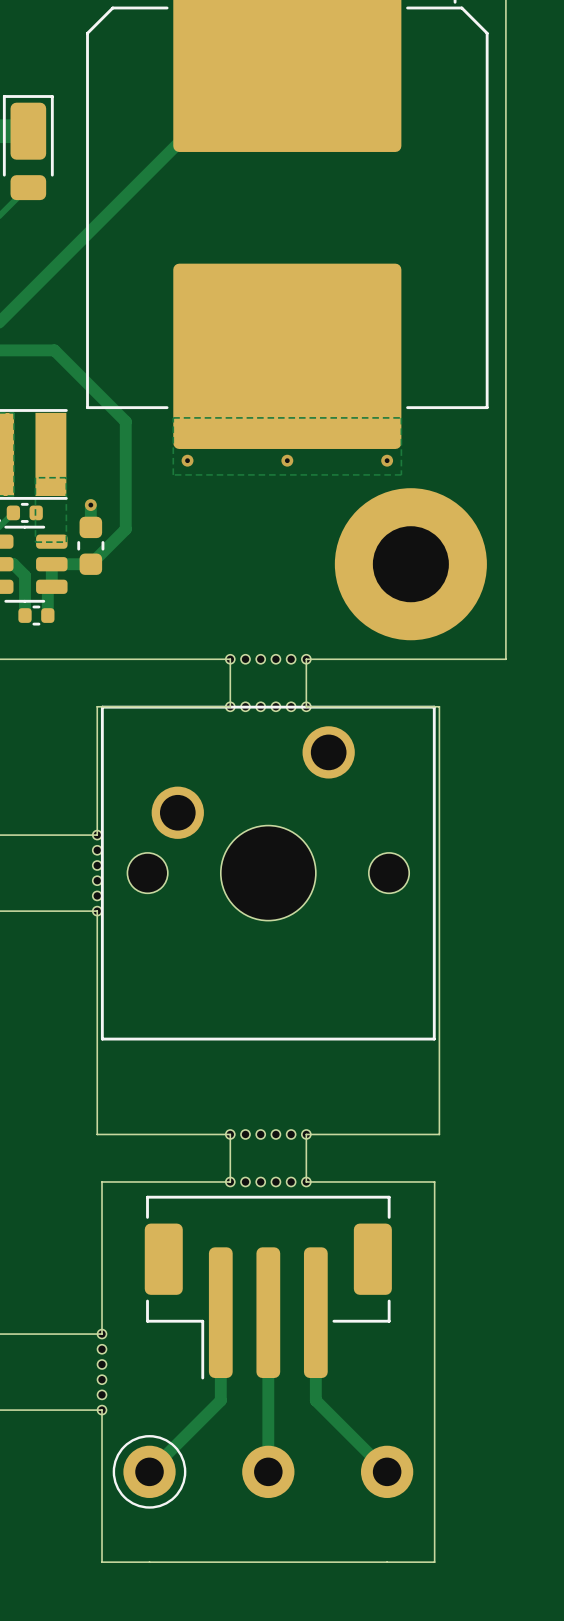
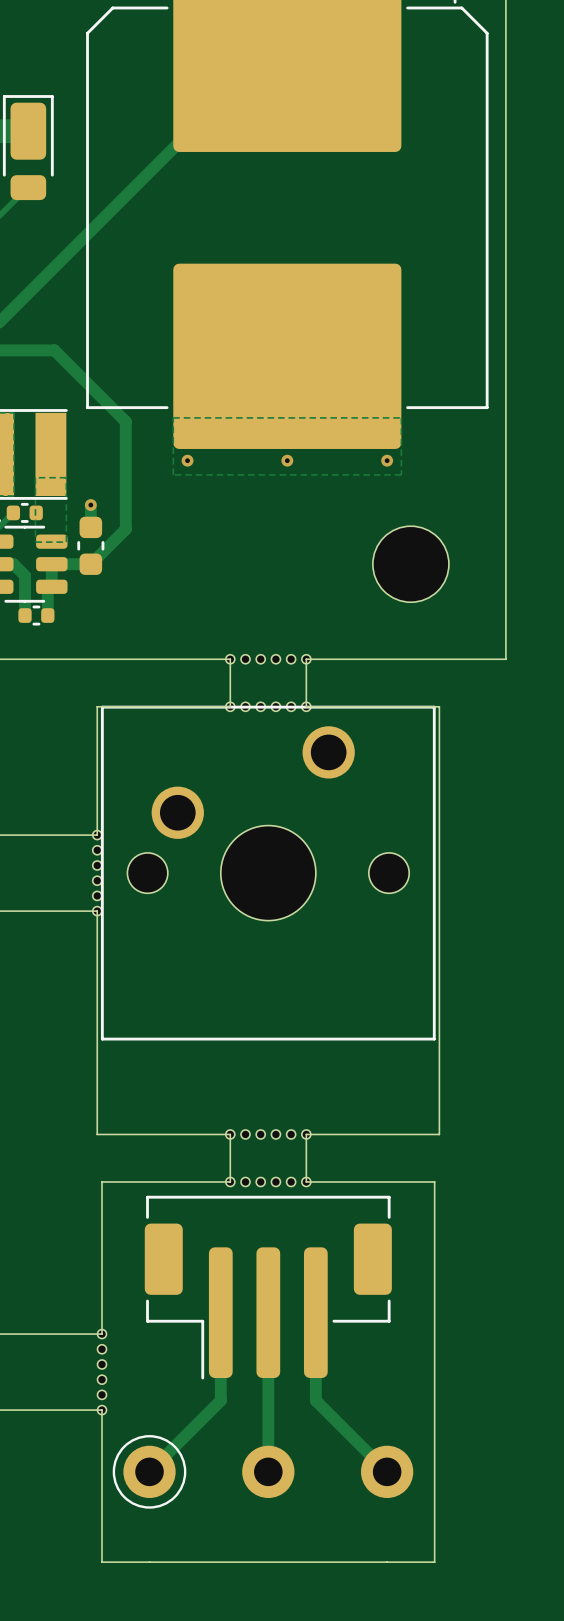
part footprint: [334, 488, 487, 641] -> [372, 526, 449, 603]

